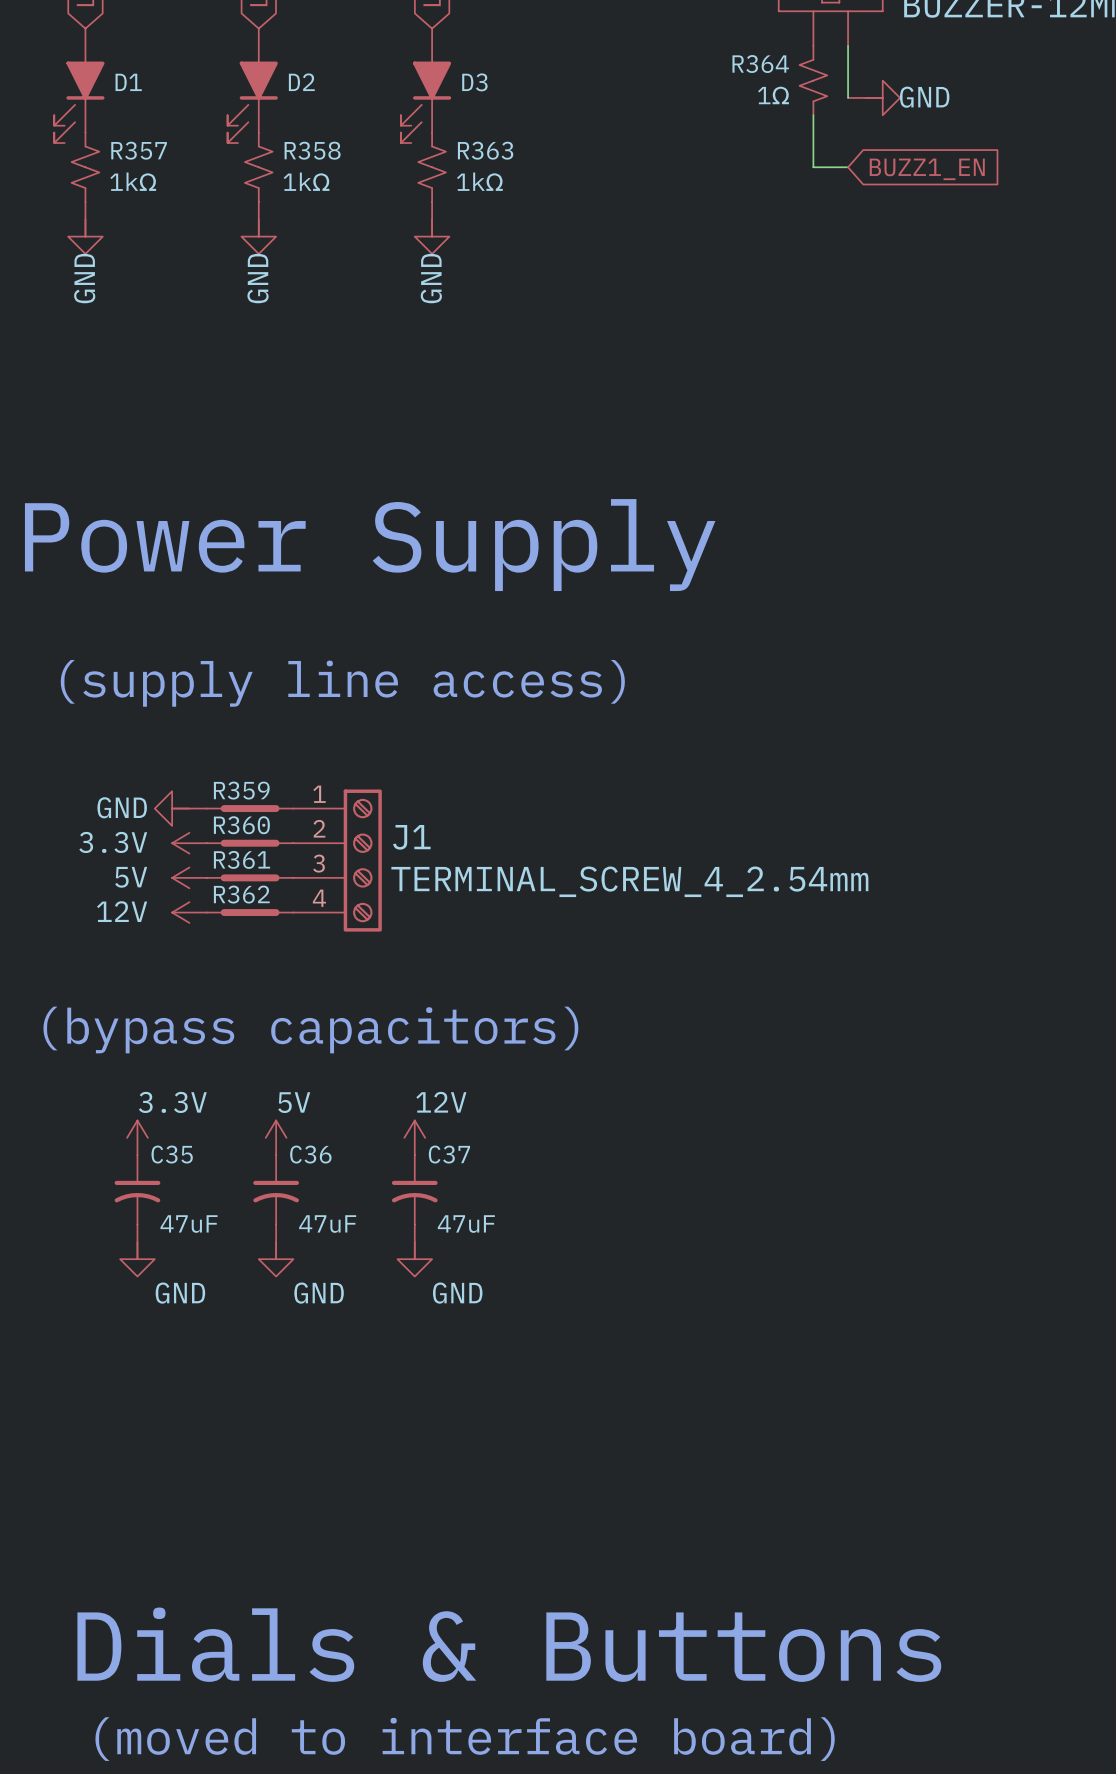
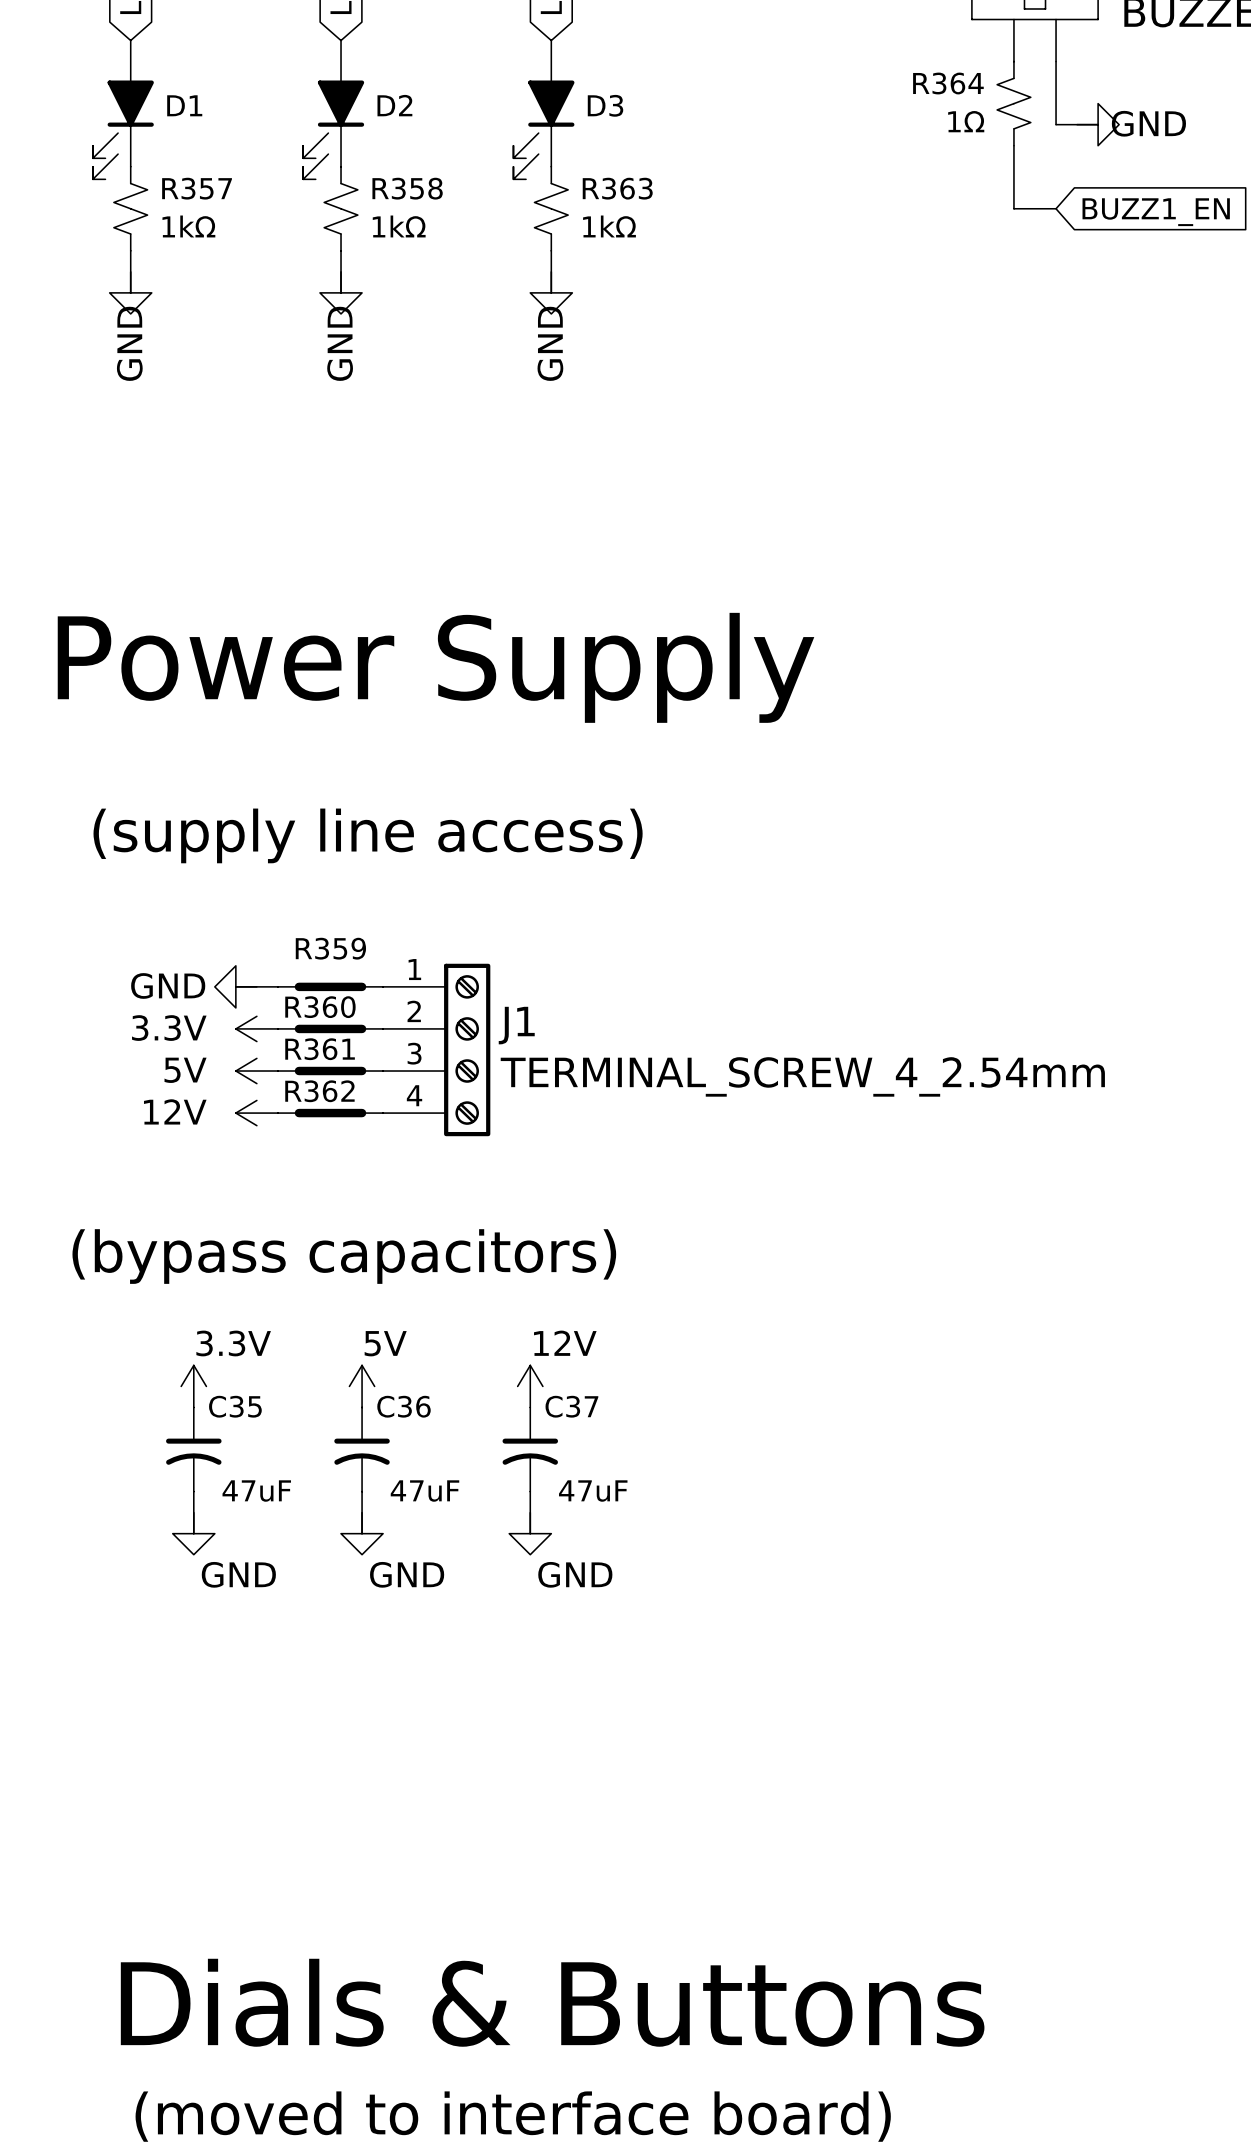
R359 name position: R359 (241, 790) -> R359 (330, 948)

